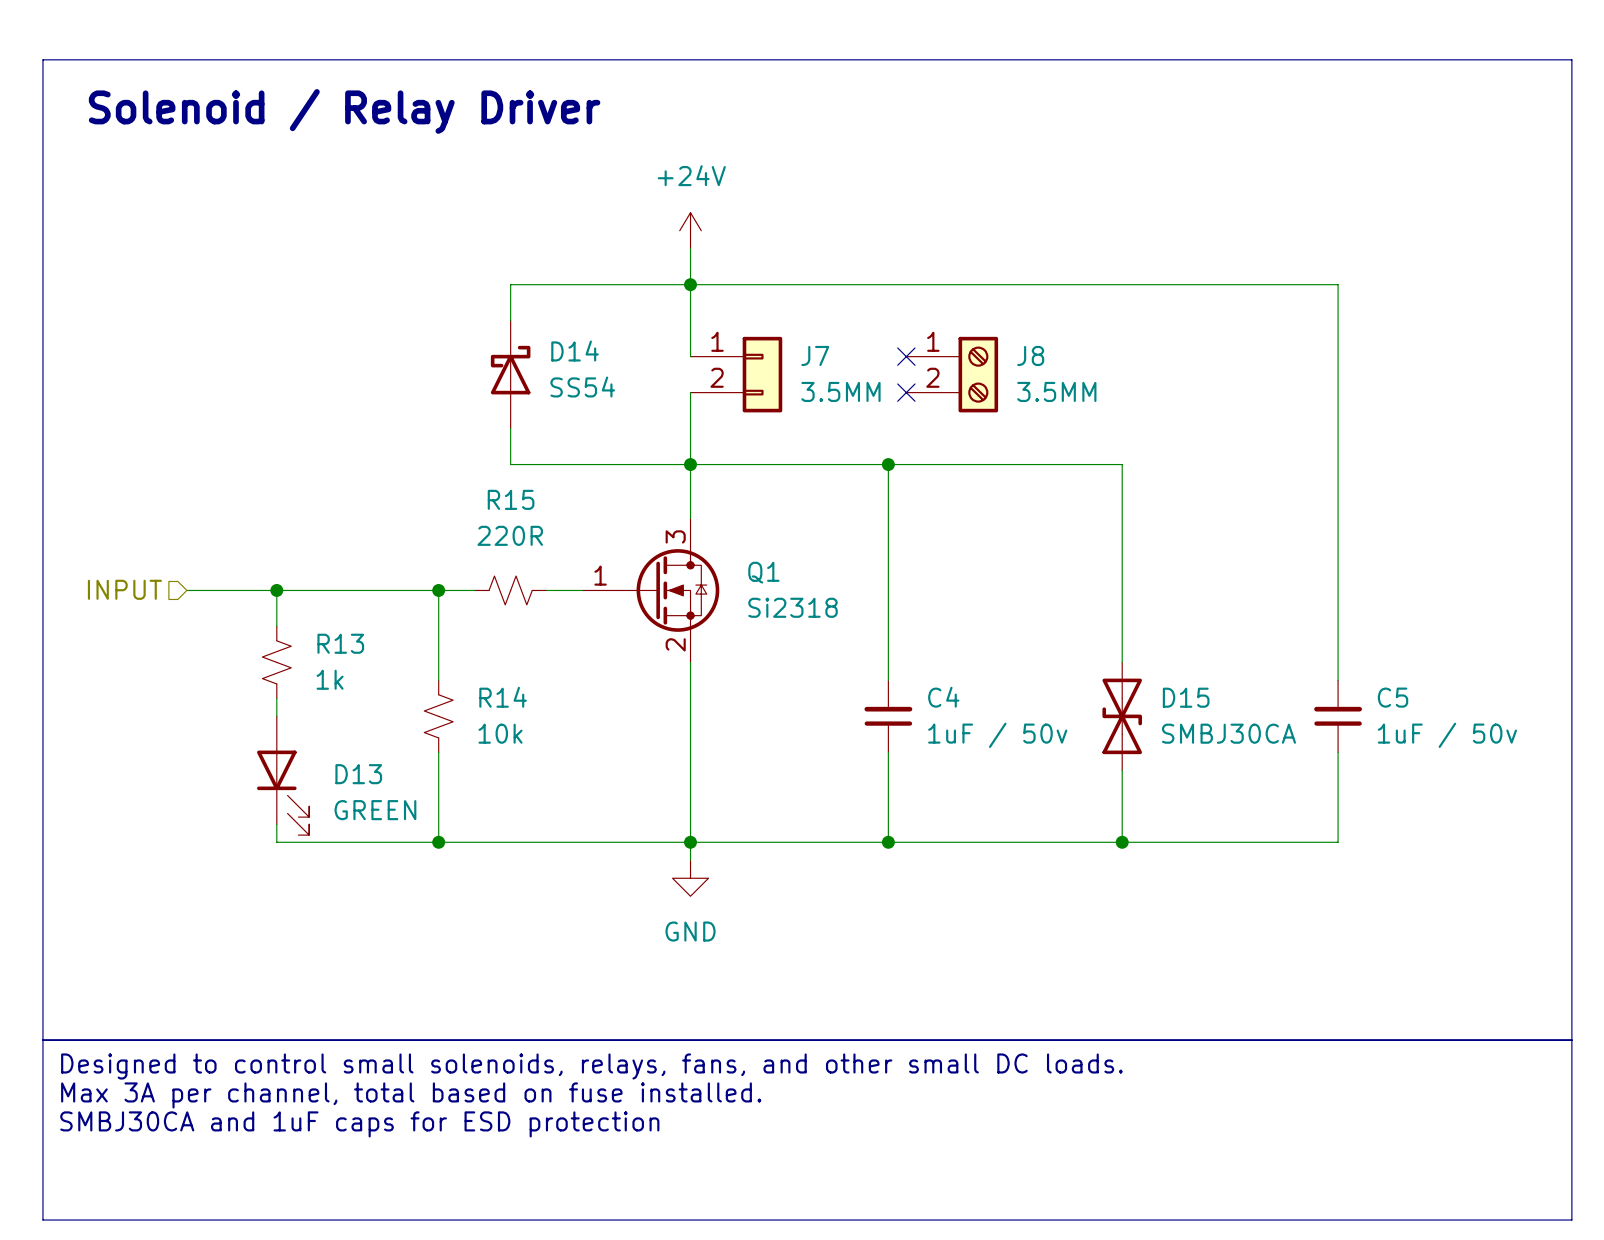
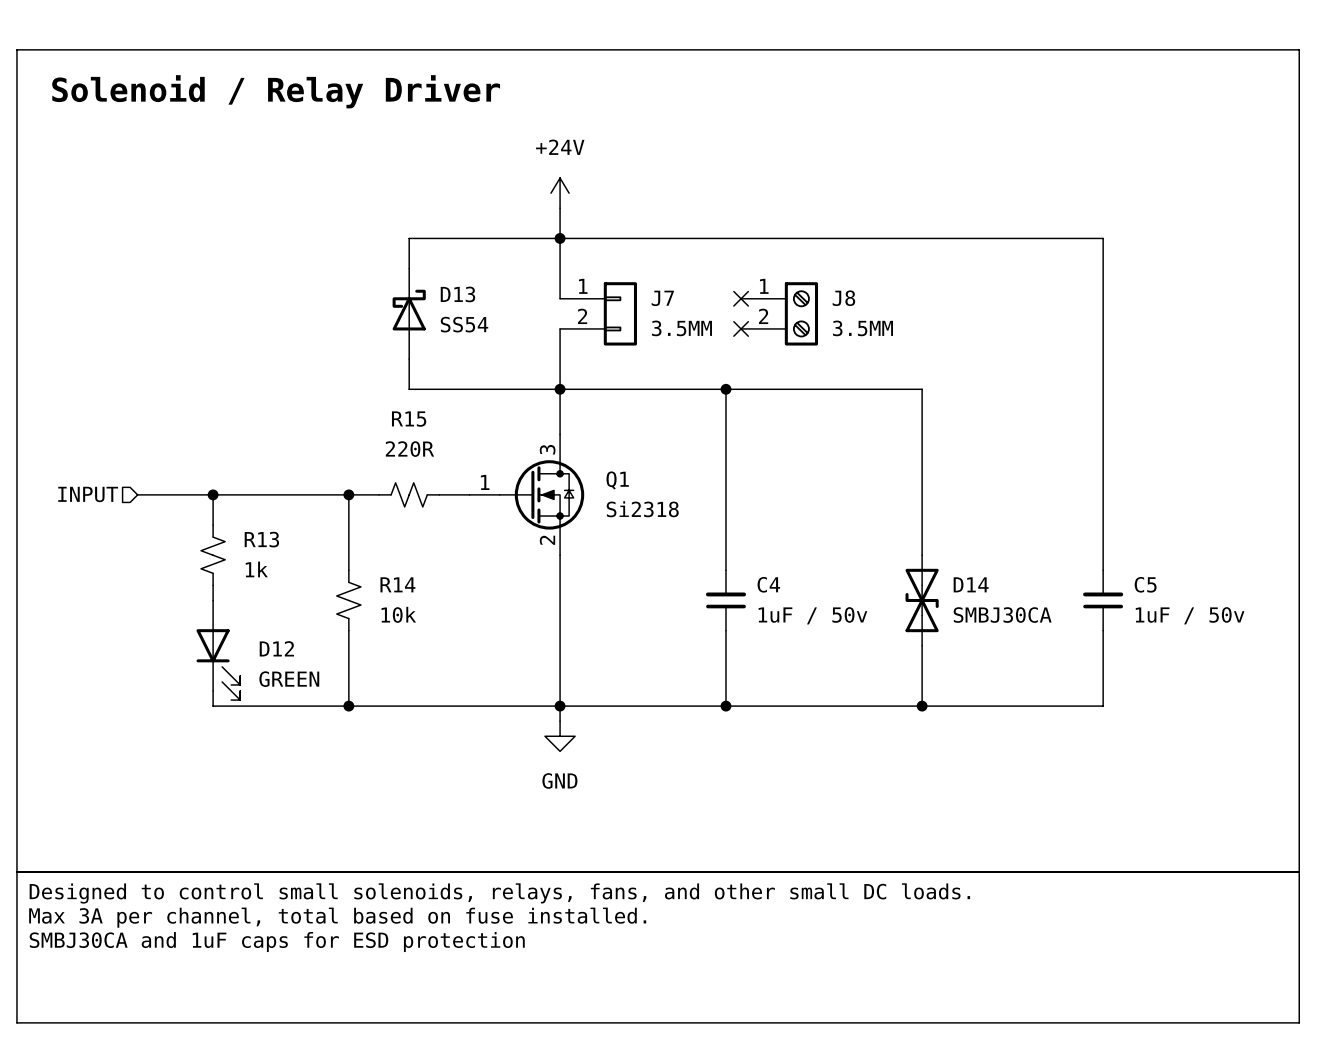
D14 name: D14 (575, 351) -> D13 (457, 294)
D15 name: D15 (1186, 697) -> D14 (971, 584)
D13 name: D13 (358, 774) -> D12 (276, 648)

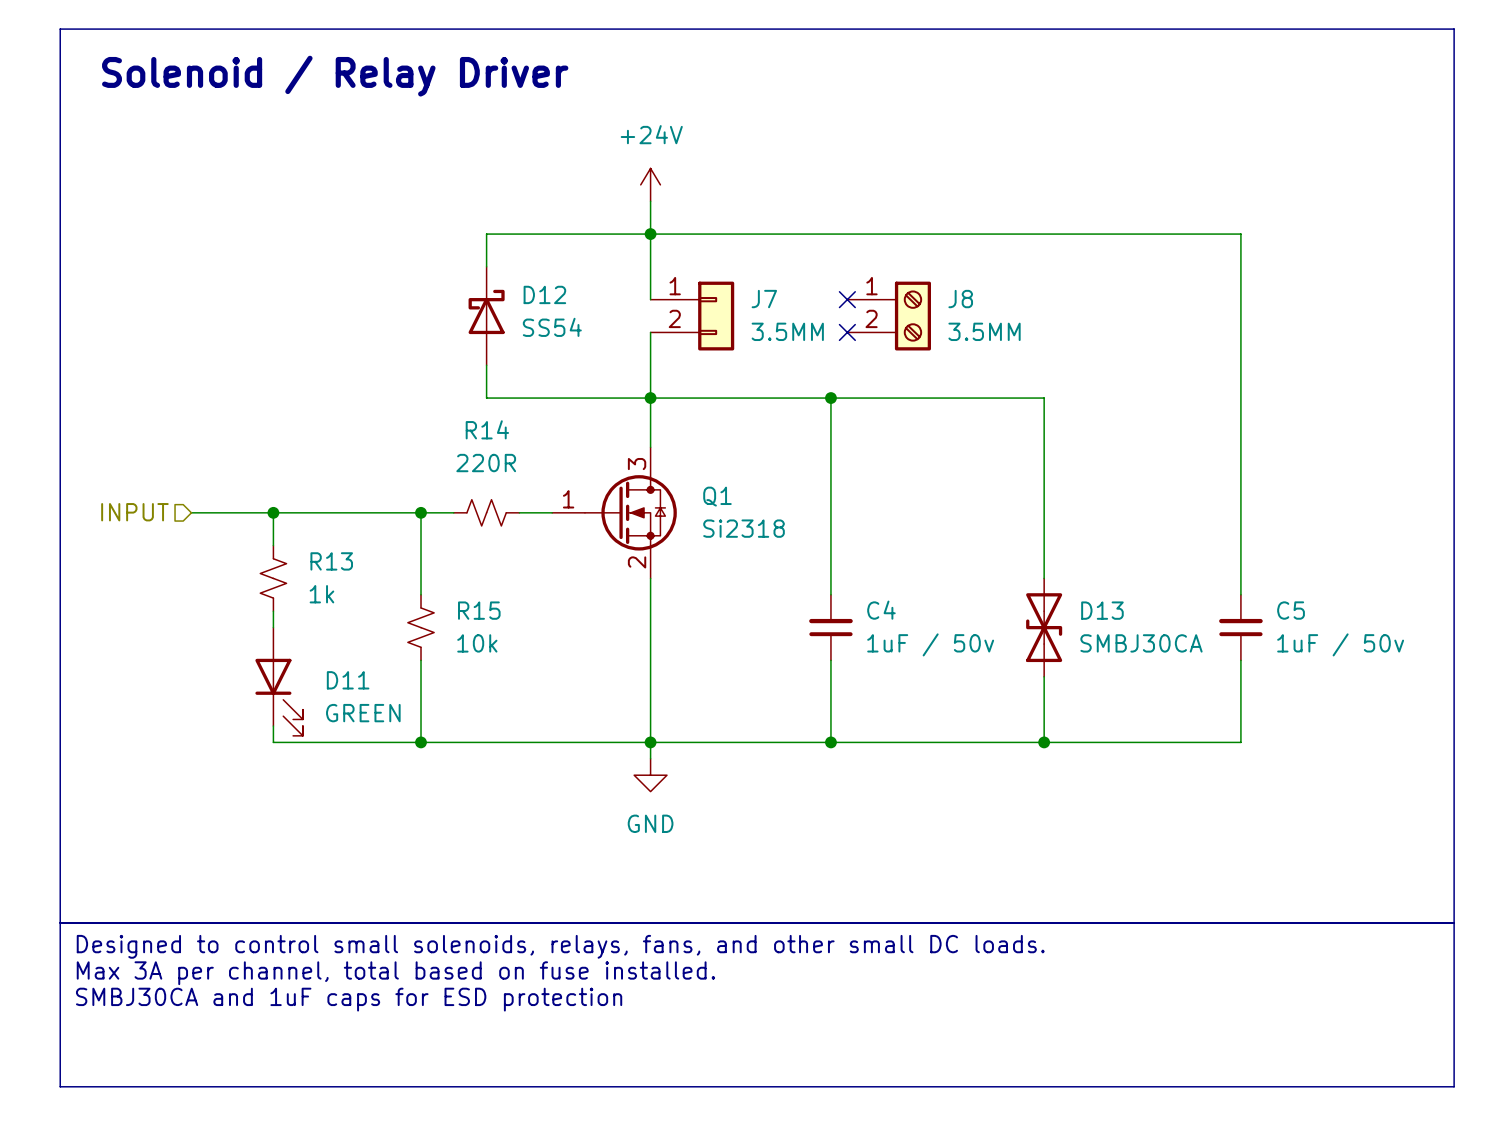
D13 name: D13 (457, 294) -> D12 (544, 294)
R15 name: R15 (409, 419) -> R14 (487, 429)
R14 name: R14 (397, 584) -> R15 (479, 610)
D14 name: D14 (971, 584) -> D13 (1102, 610)
D12 name: D12 (276, 648) -> D11 (348, 680)

